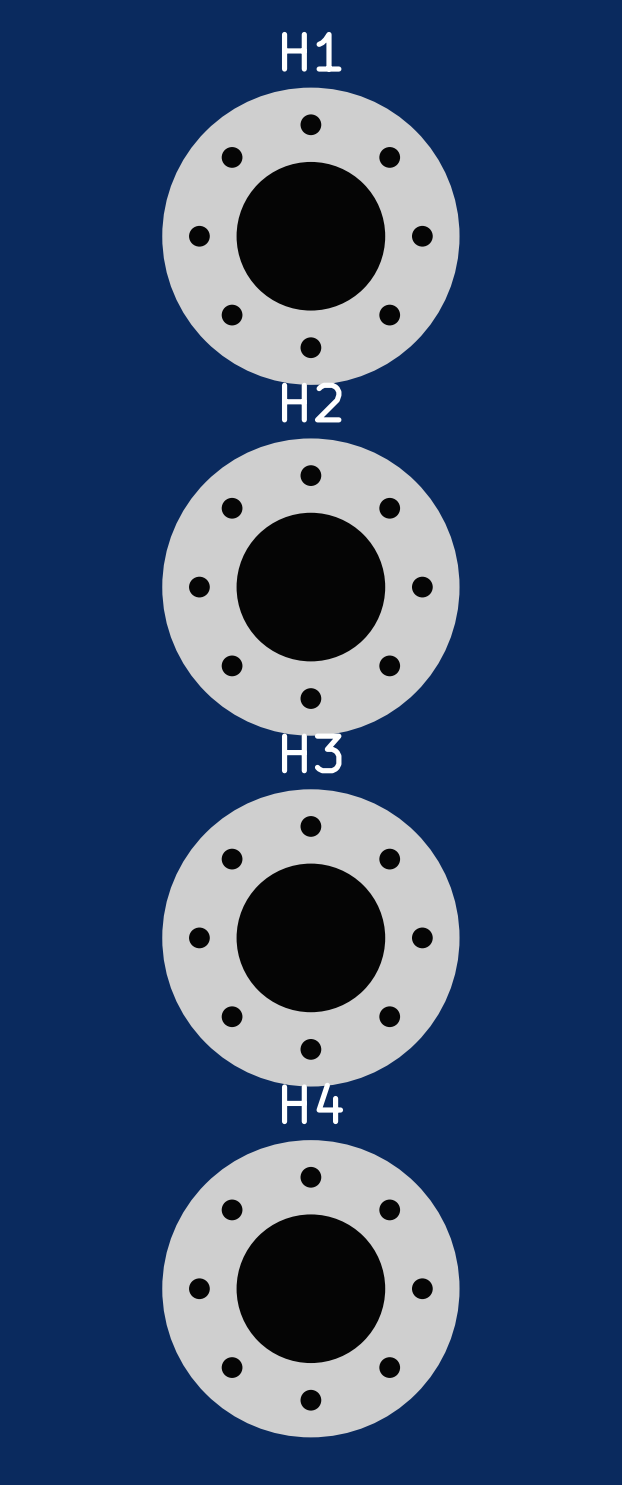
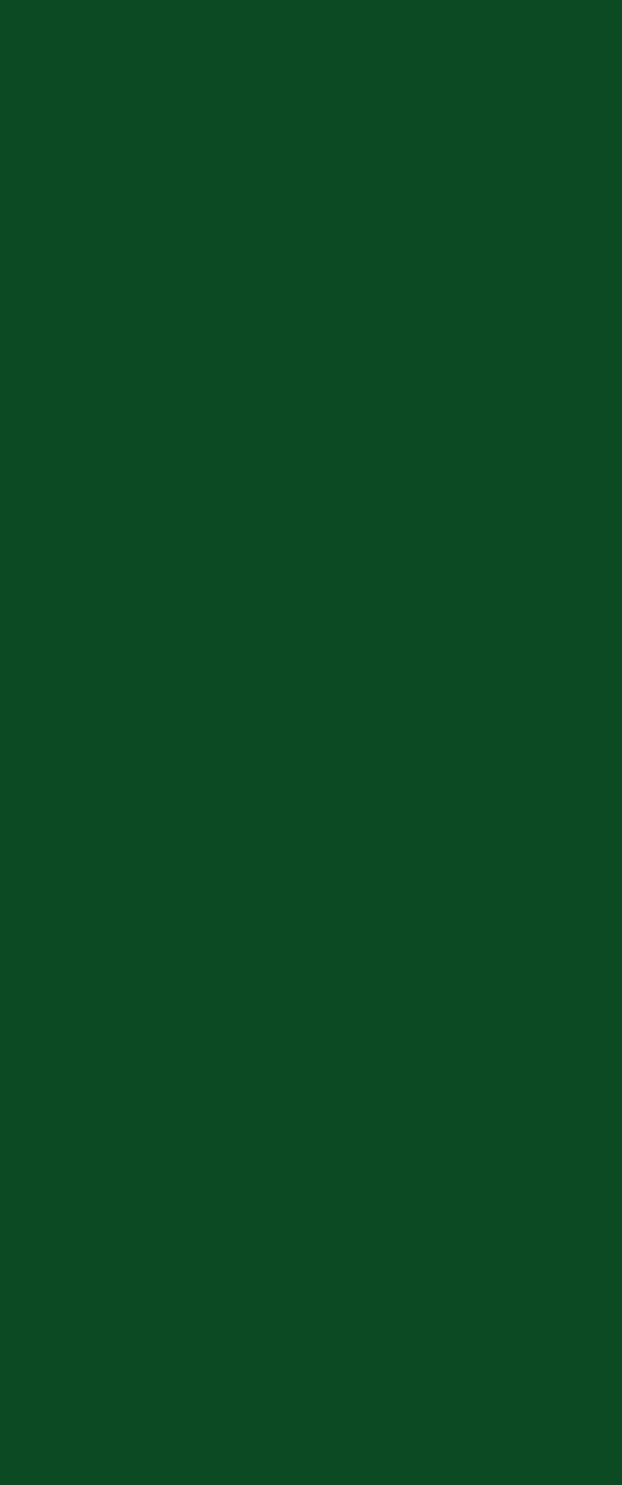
H1: (310, 236) -> none
H2: (310, 587) -> none
H3: (310, 937) -> none
H4: (310, 1288) -> none

